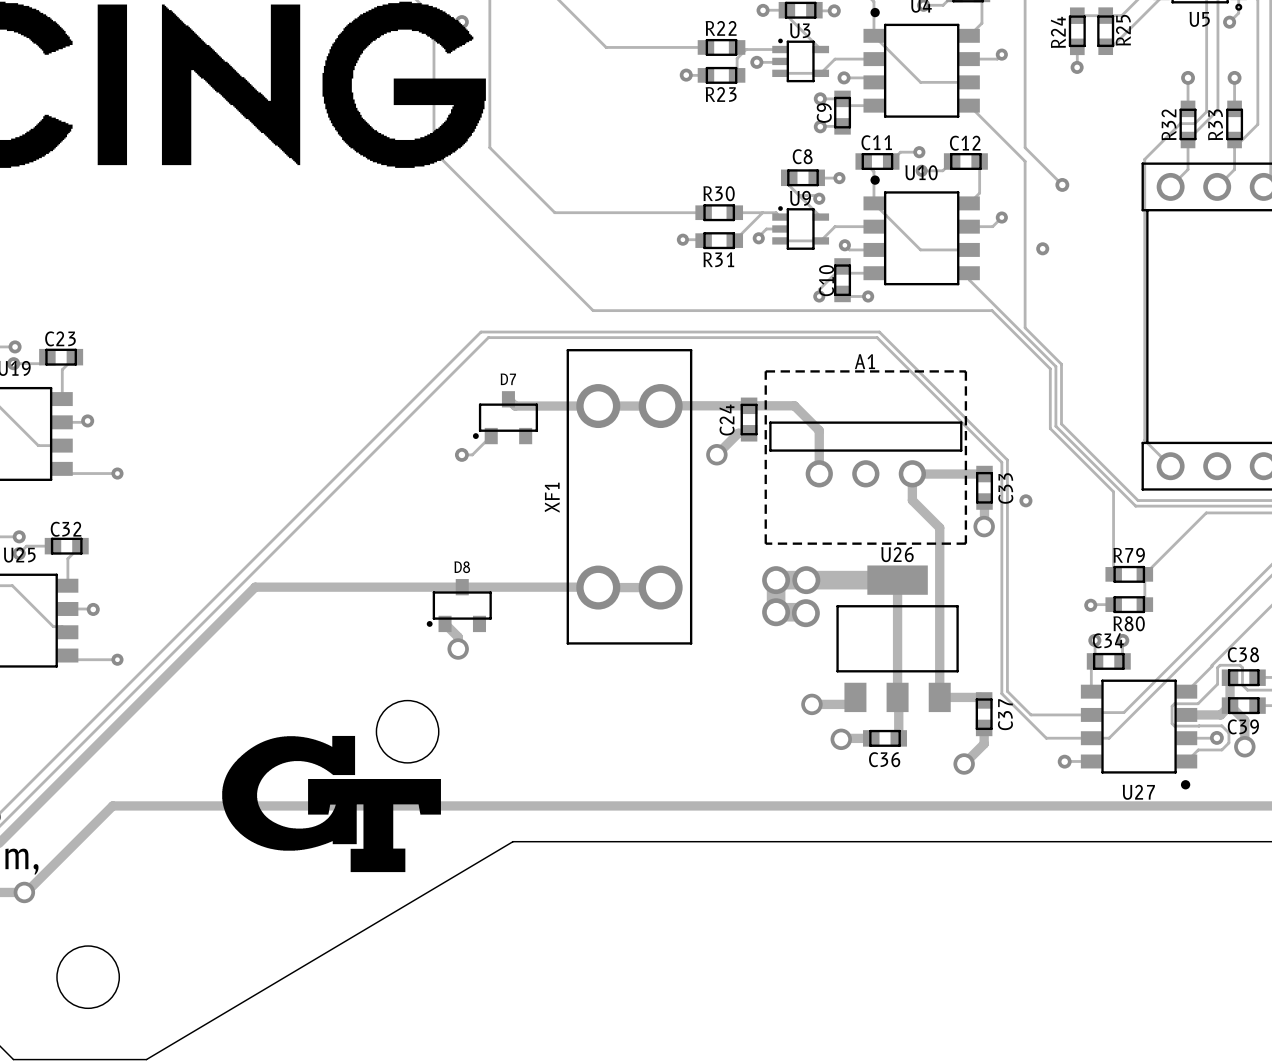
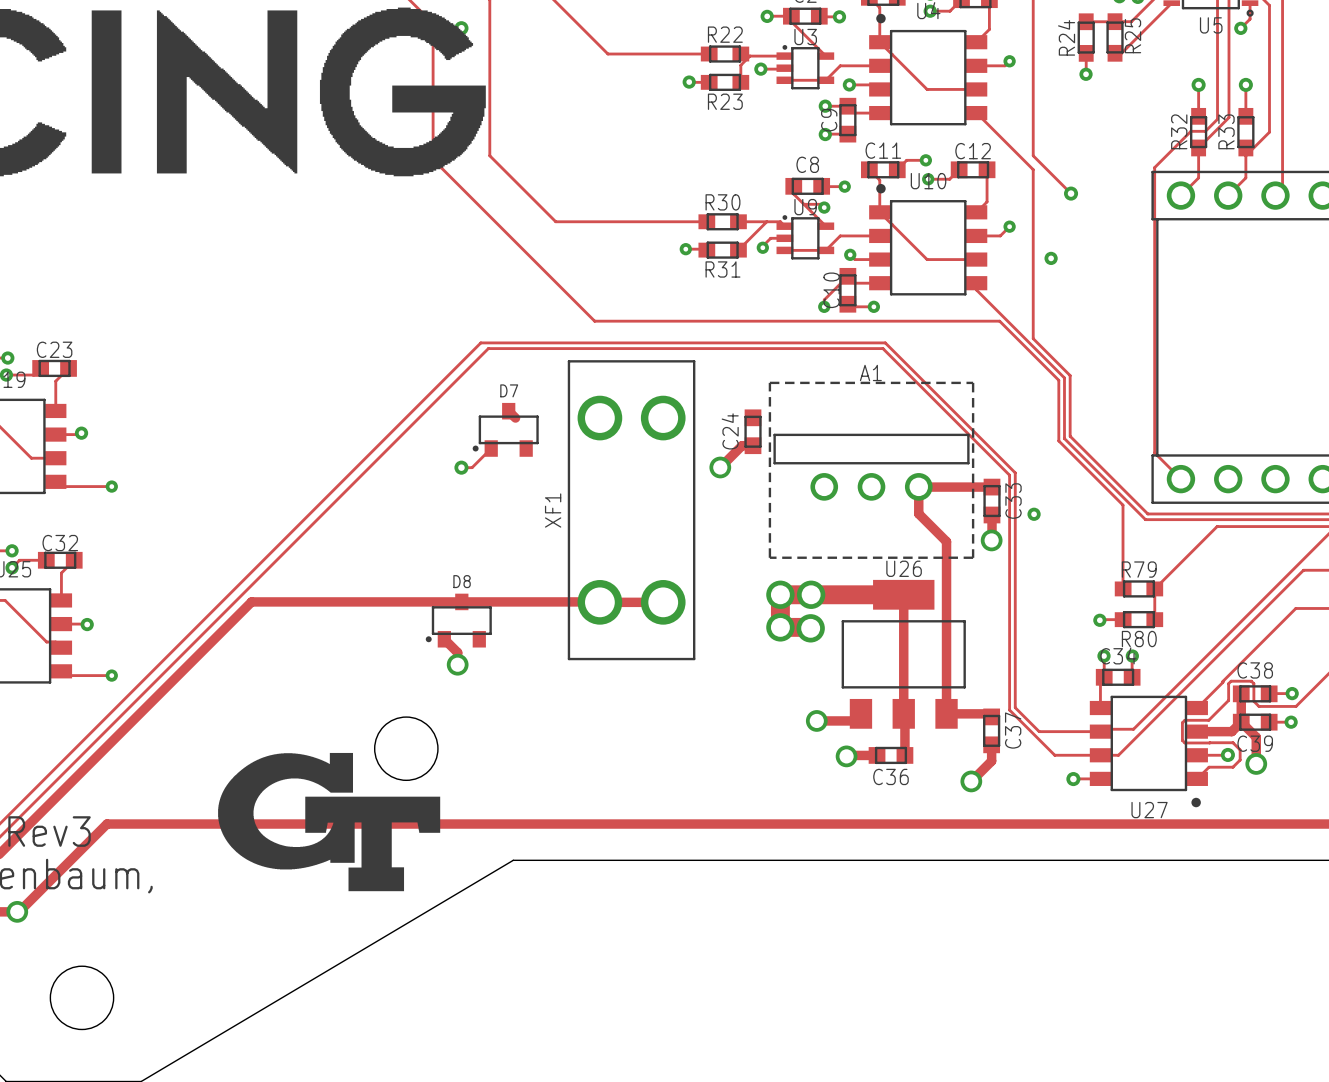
track: (660, 405) (794, 405) (819, 430) (819, 473) -> none
track: (515, 406) (660, 406) -> none

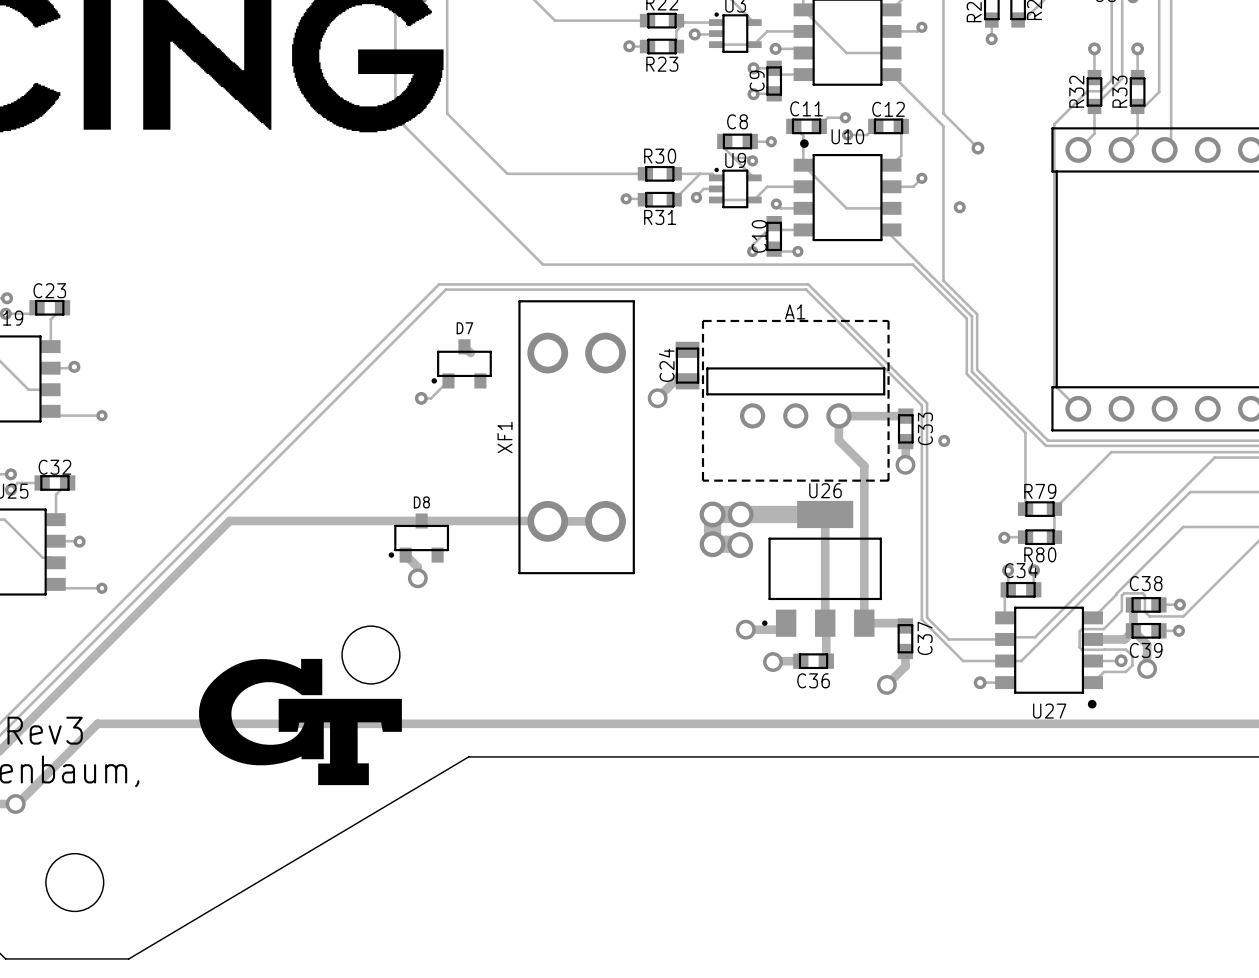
C24 footprint: [744, 409, 762, 455] -> [675, 341, 700, 390]
U26 footprint: [841, 579, 966, 729] -> [762, 500, 882, 637]

